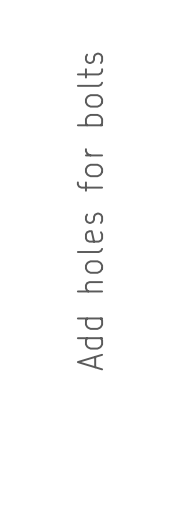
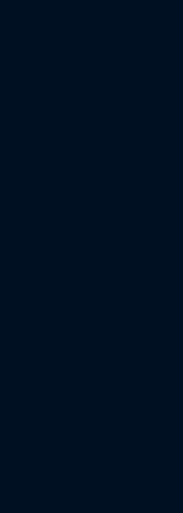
text: Add holes for bolts (89, 211) -> none

